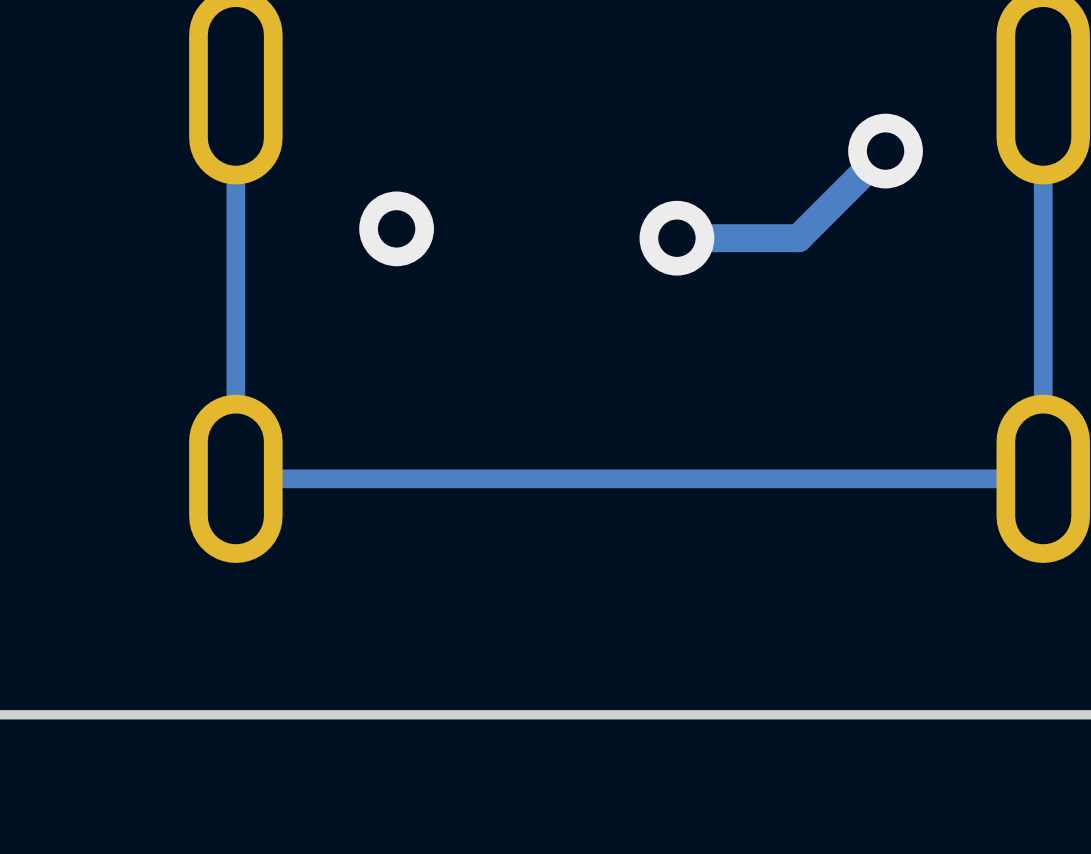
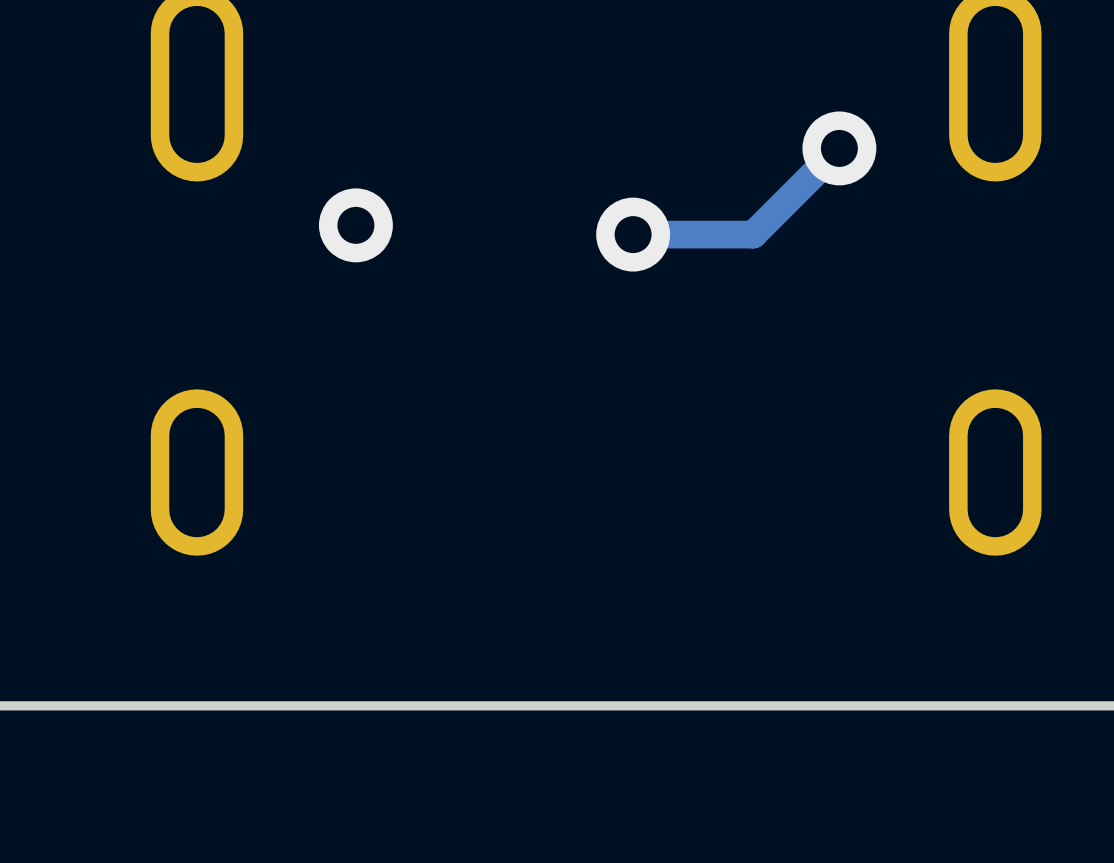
track: (1043, 86) (1043, 478) (235, 478) (235, 86) -> none

